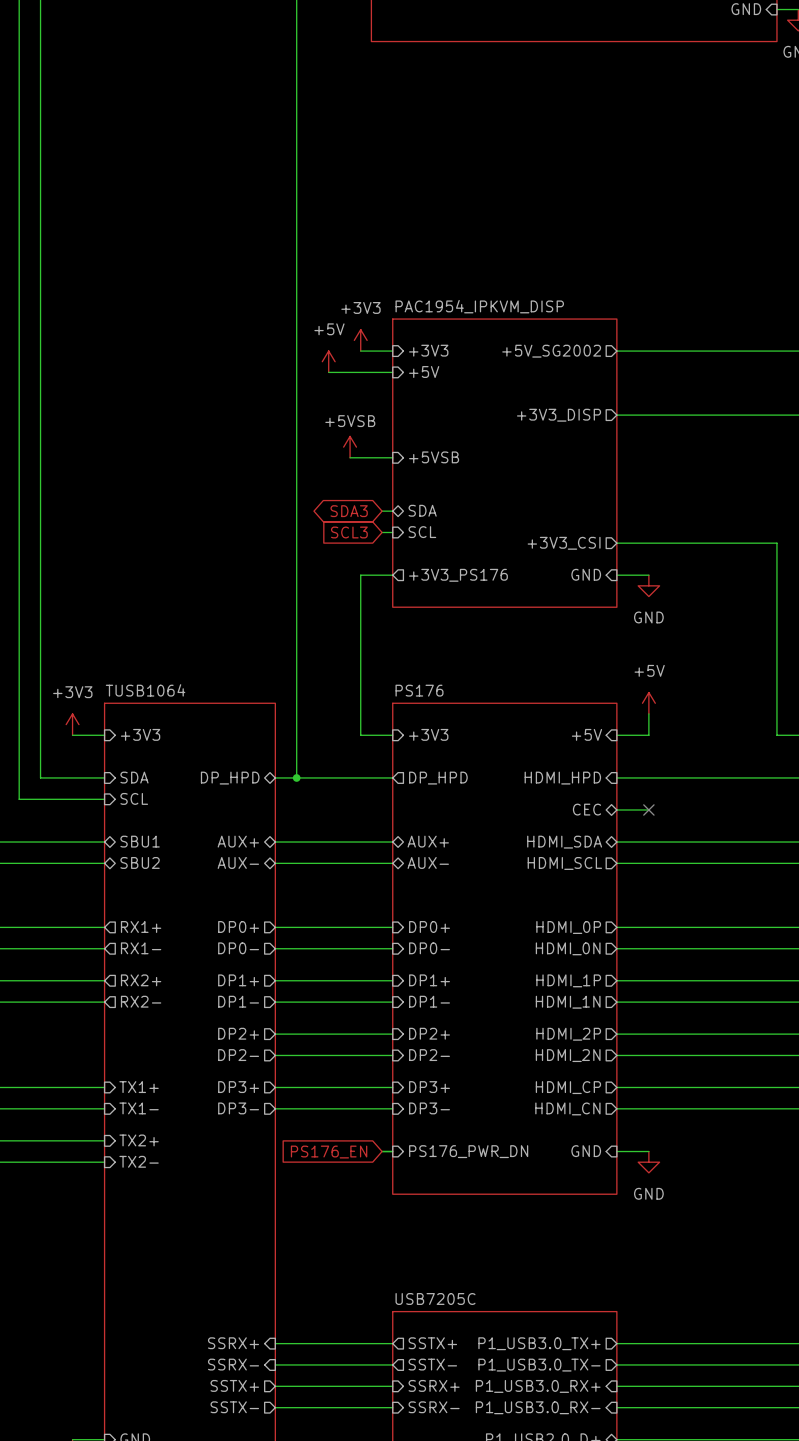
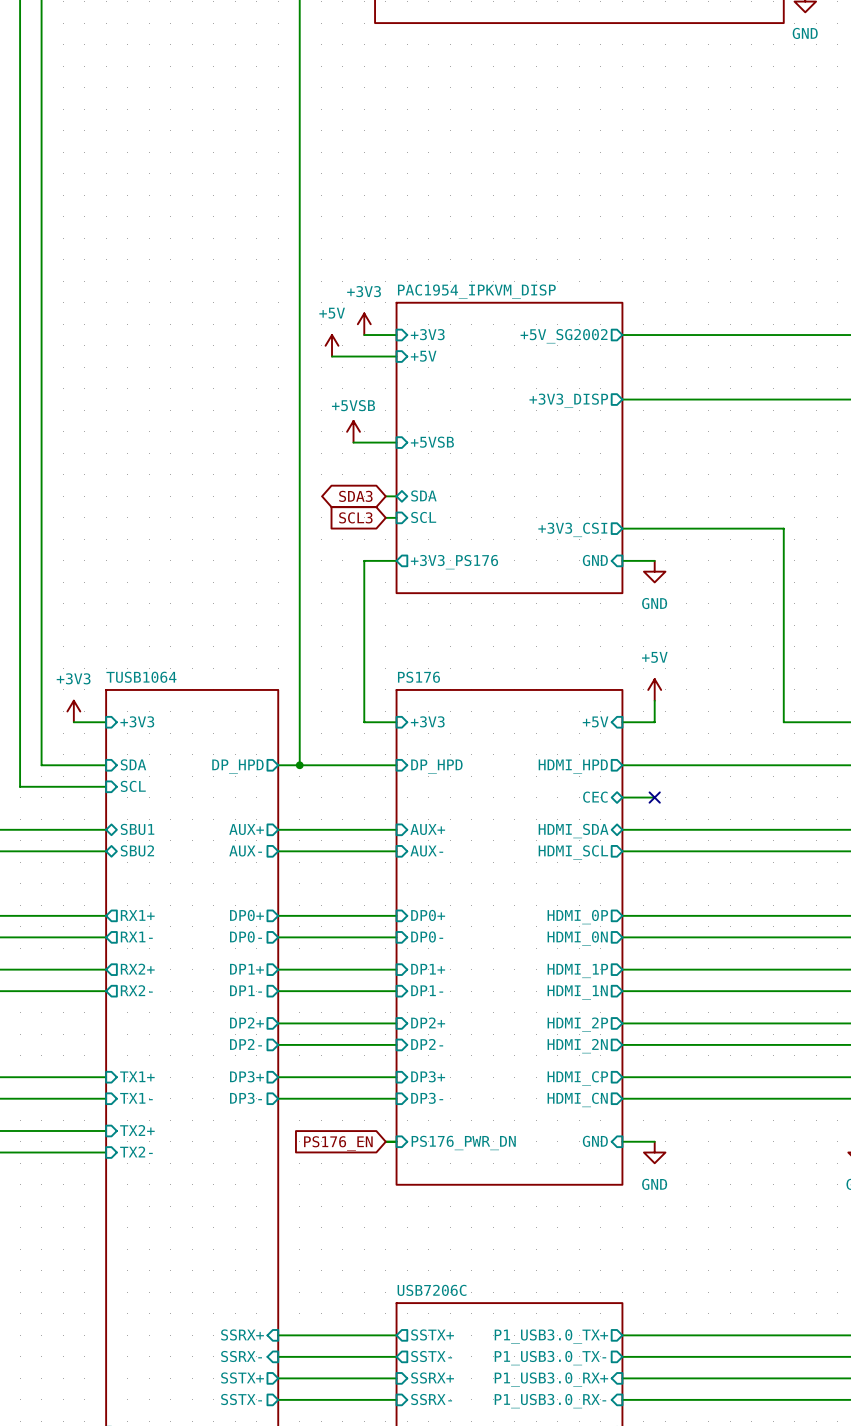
sheet pin shape: bidirectional (230, 778) -> output (237, 766)
sheet pin shape: output (438, 778) -> input (436, 766)
sheet pin shape: input (562, 778) -> output (573, 766)
sheet pin shape: bidirectional (238, 841) -> output (246, 829)
sheet pin shape: bidirectional (428, 841) -> input (427, 829)
sheet pin shape: bidirectional (238, 862) -> output (245, 851)
sheet pin shape: bidirectional (428, 862) -> input (426, 851)
sheet USB7205C name: USB7205C (435, 1298) -> USB7206C (432, 1290)

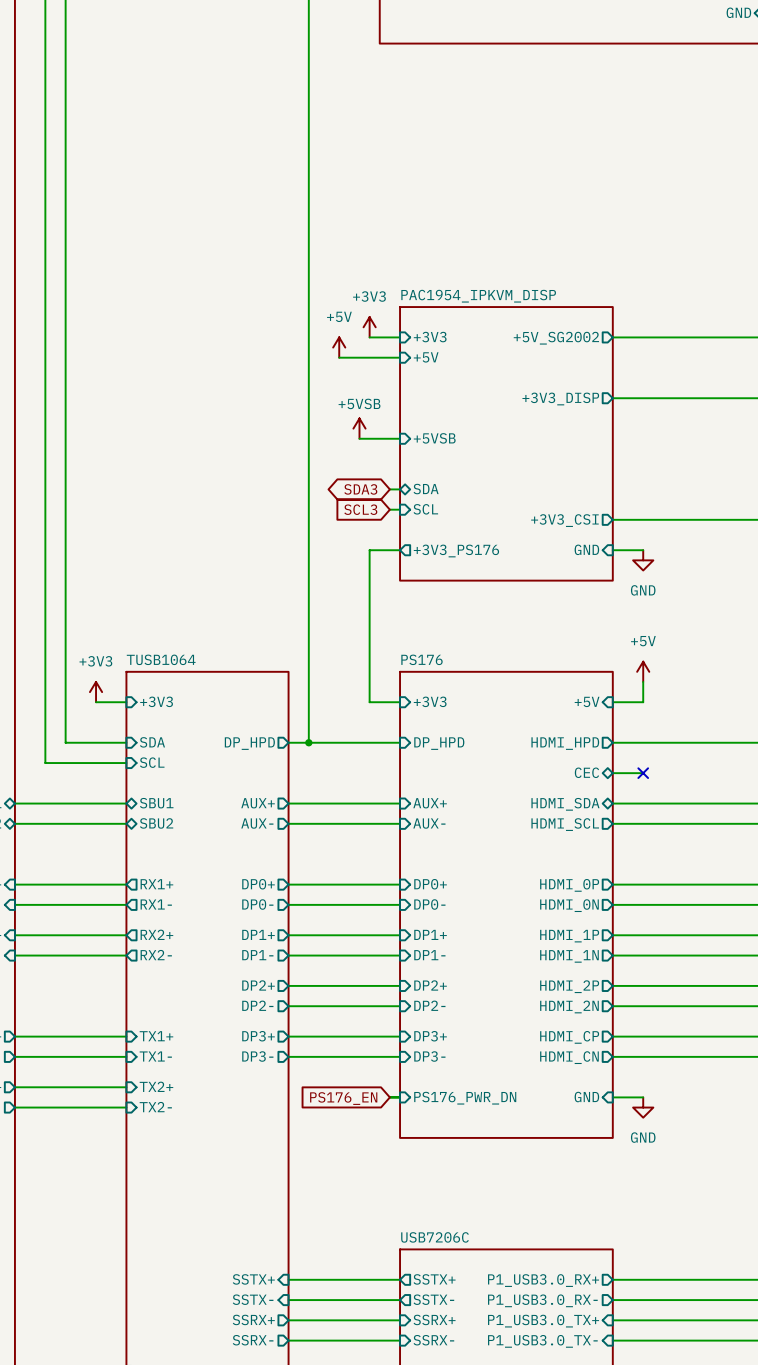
sheet pin: SSRX+ (242, 1334) -> SSTX+ (253, 1279)
sheet pin: P1_USB3.0_TX+ (551, 1336) -> P1_USB3.0_RX+ (543, 1280)
sheet pin: SSRX- (241, 1356) -> SSTX- (253, 1299)
sheet pin: P1_USB3.0_TX- (550, 1358) -> P1_USB3.0_RX- (542, 1300)
sheet pin: SSTX+ (242, 1378) -> SSRX+ (253, 1319)
sheet pin: P1_USB3.0_RX+ (551, 1379) -> P1_USB3.0_TX+ (543, 1321)
sheet pin: SSTX- (241, 1399) -> SSRX- (253, 1340)
sheet pin: P1_USB3.0_RX- (550, 1401) -> P1_USB3.0_TX- (542, 1341)

